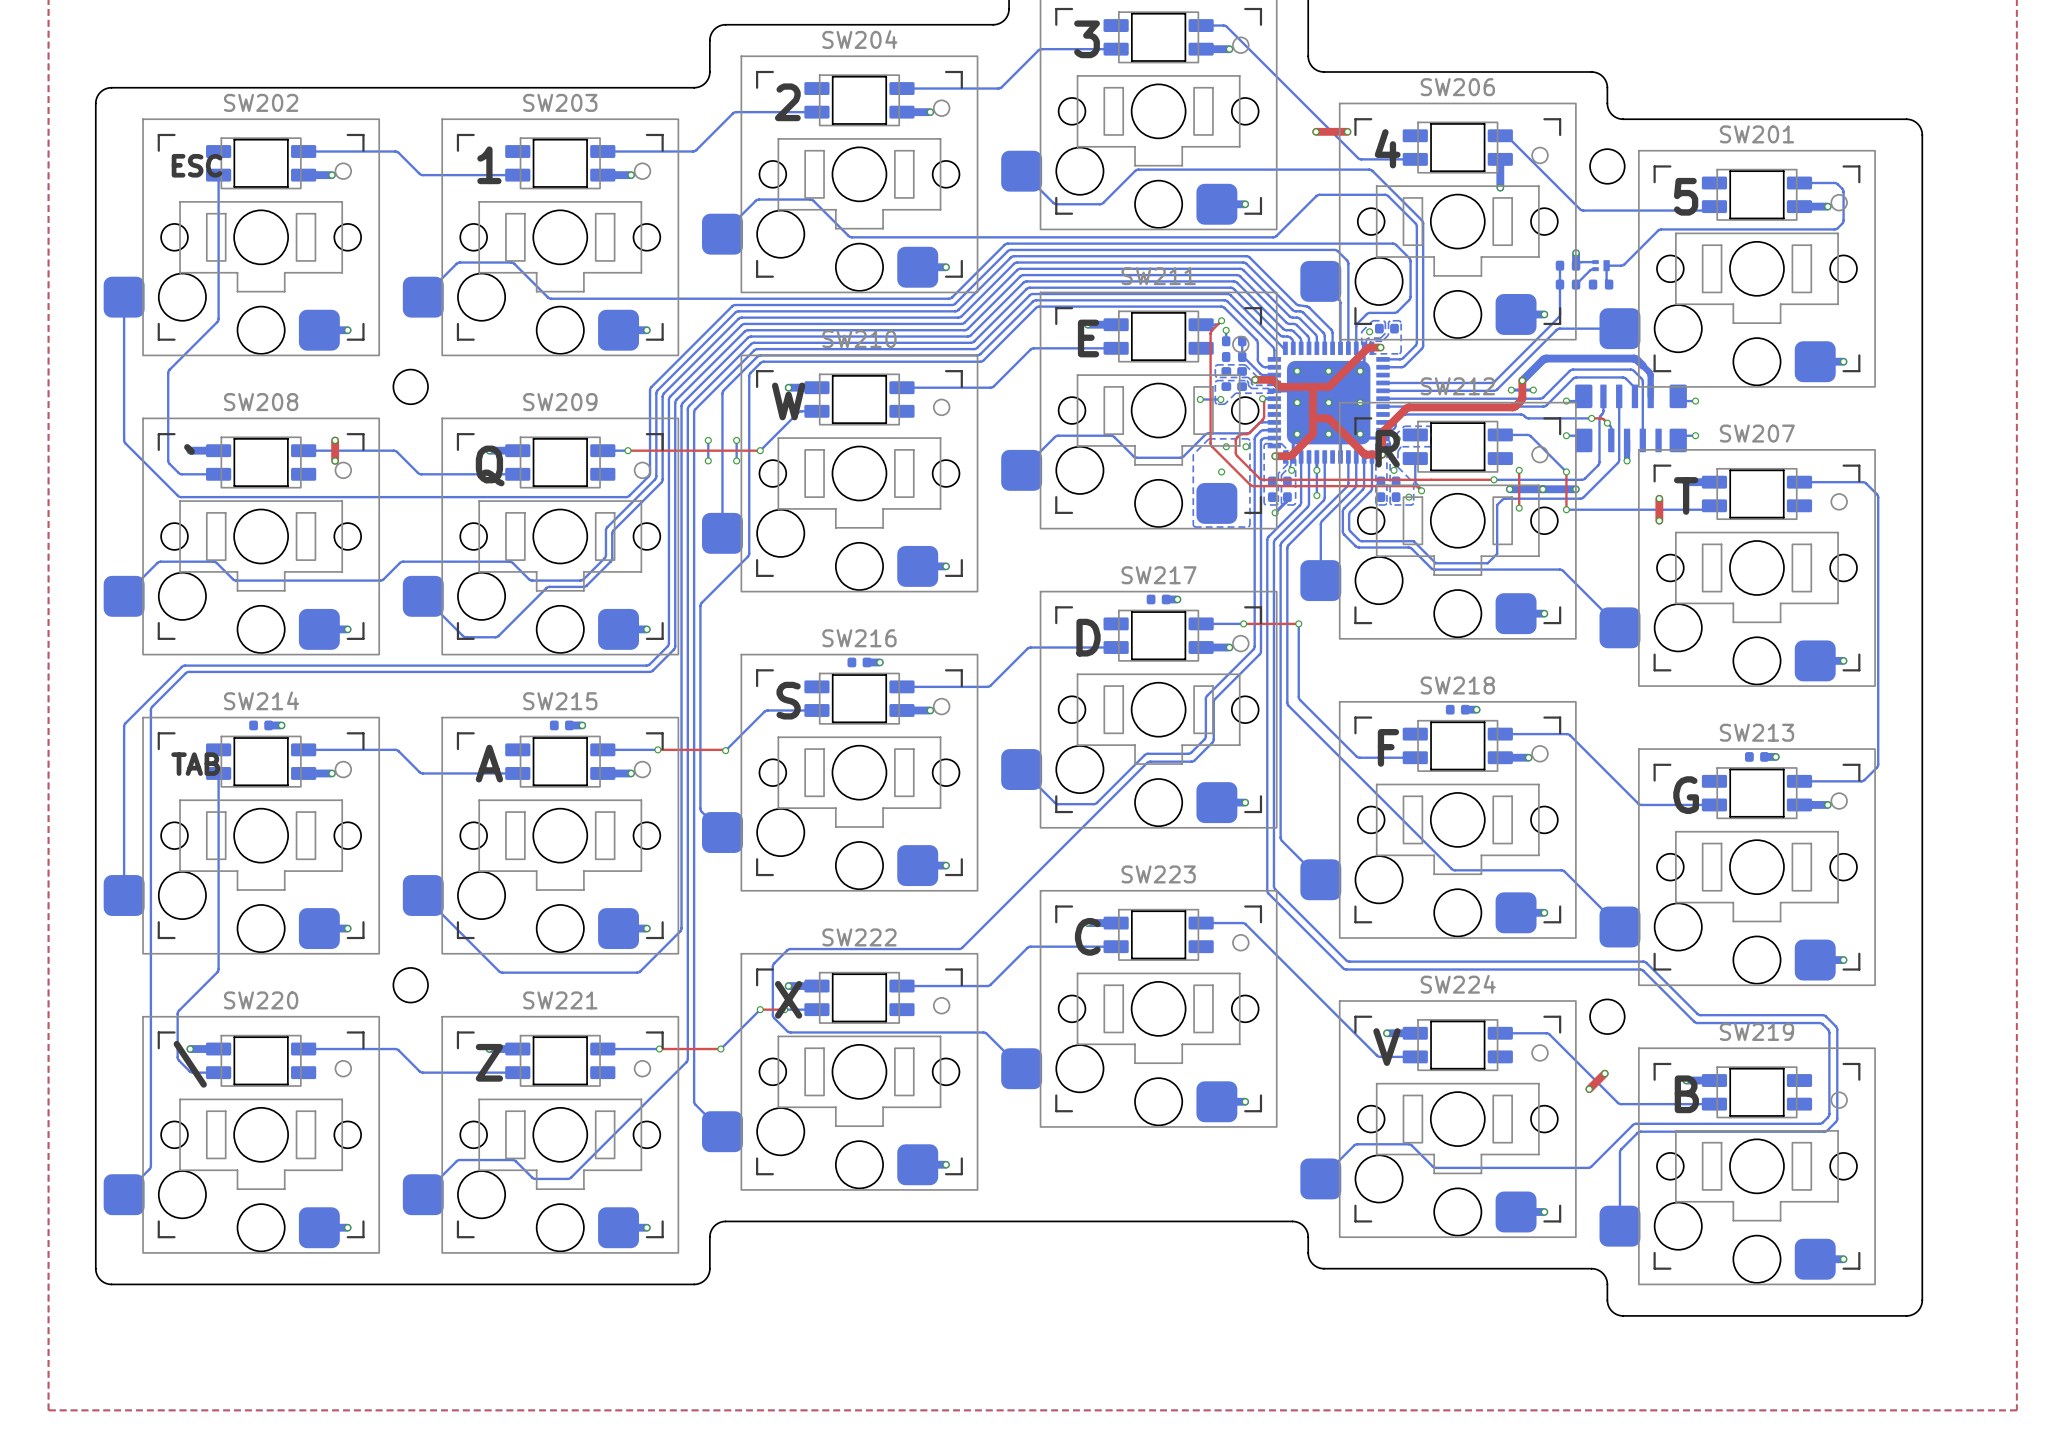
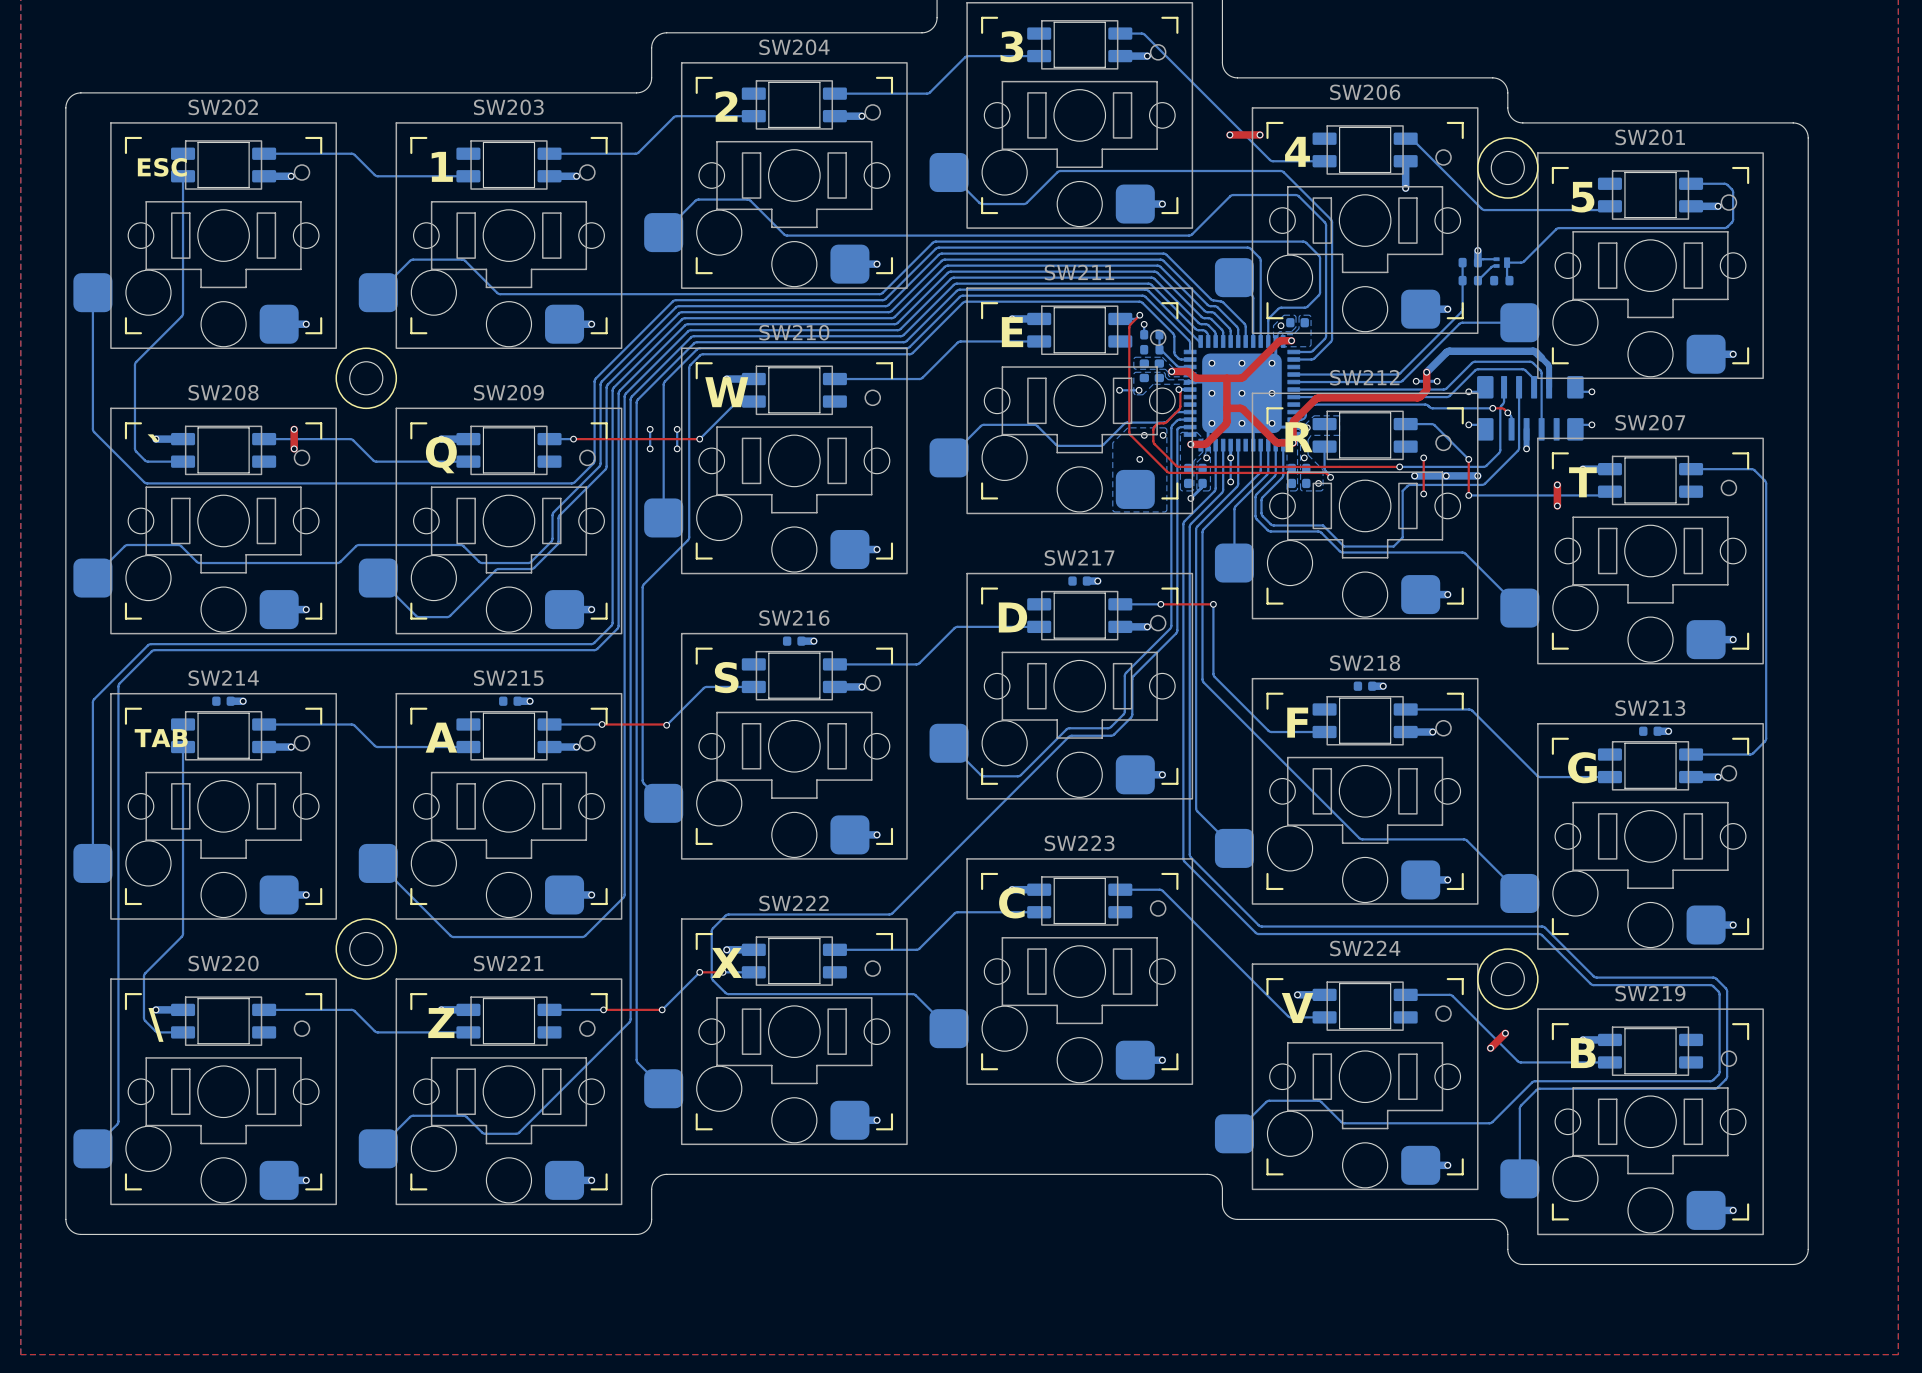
drawing: none -> [1477, 137, 1539, 199]
drawing: none -> [335, 347, 398, 410]
drawing: none -> [335, 918, 398, 980]
drawing: none -> [1477, 948, 1539, 1010]

